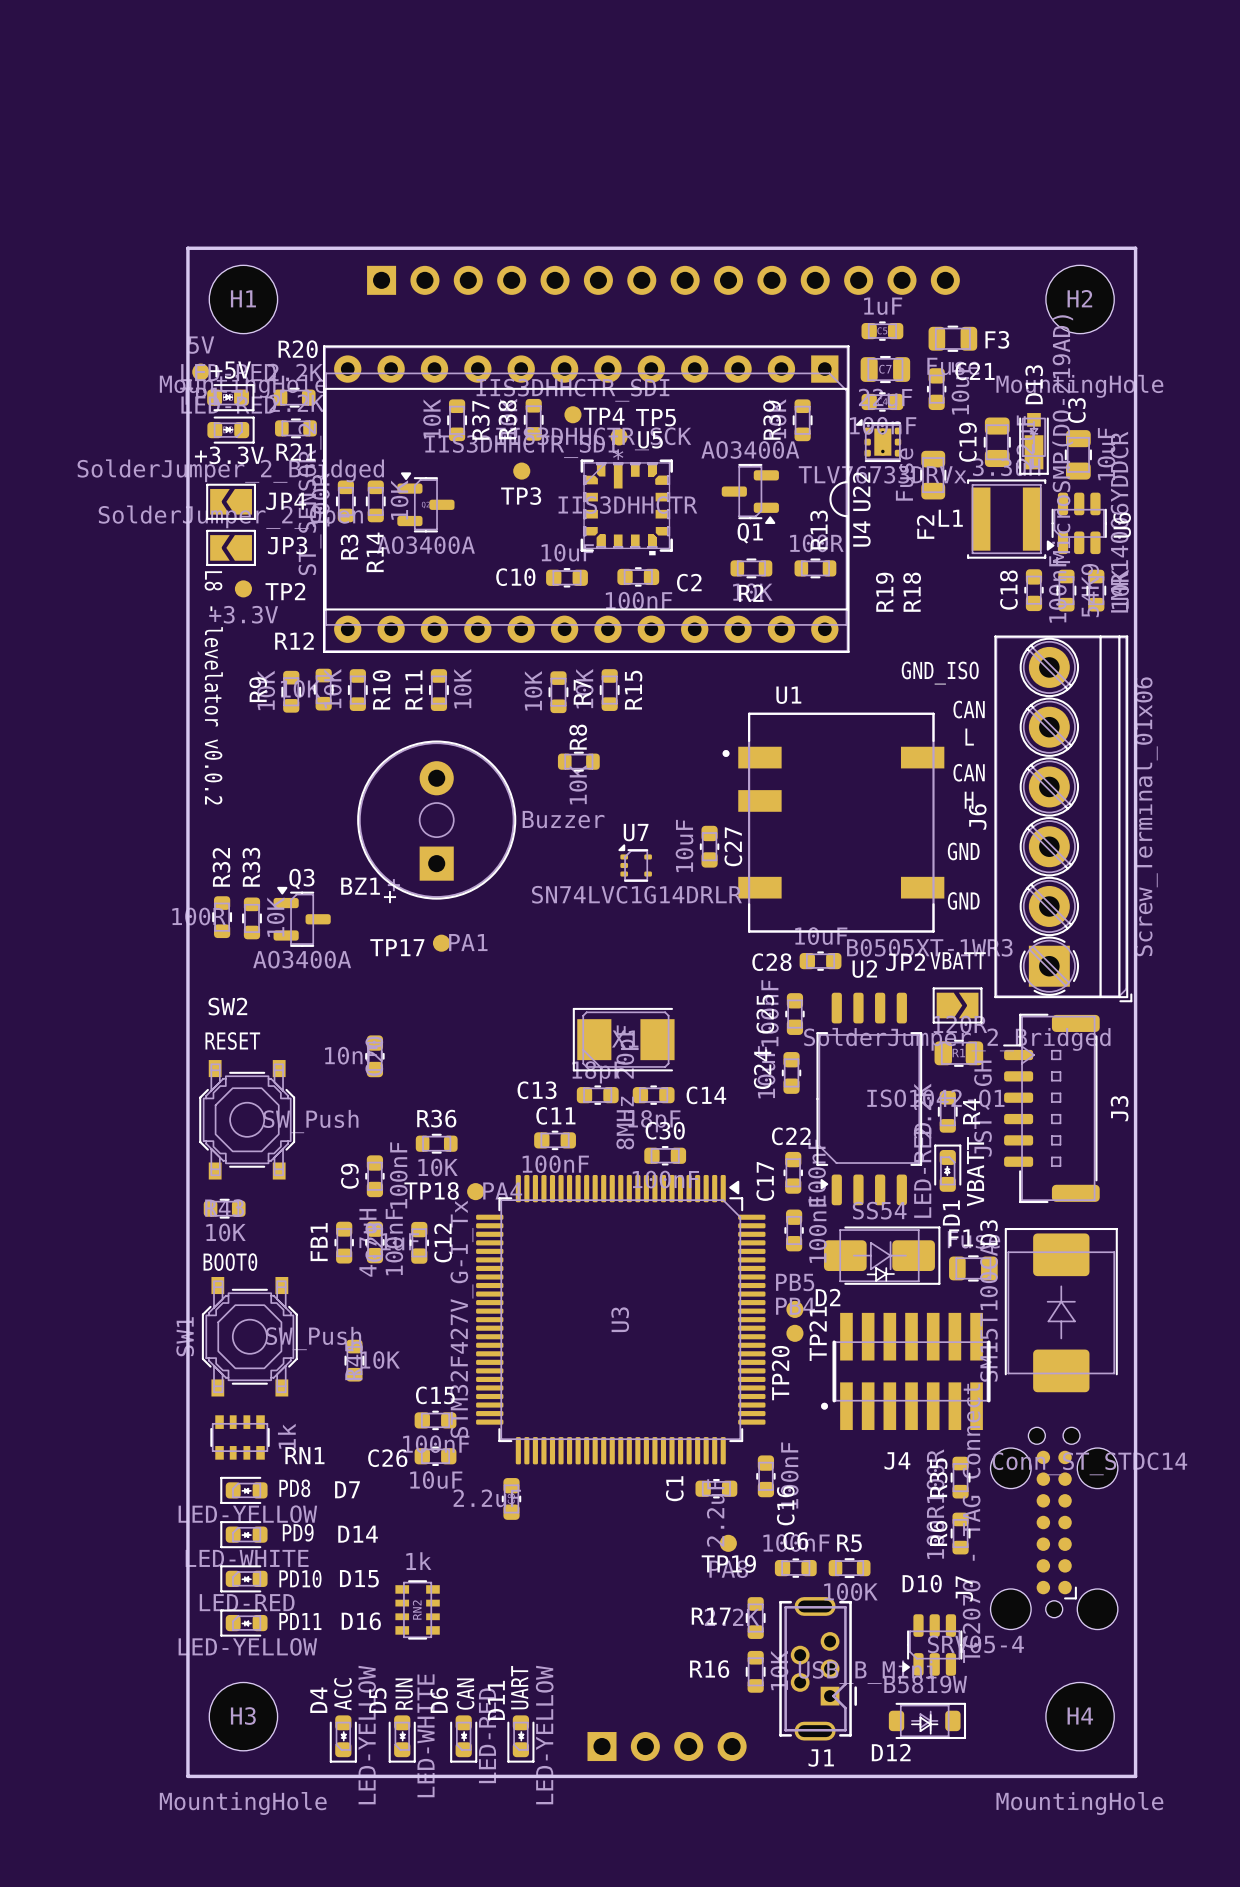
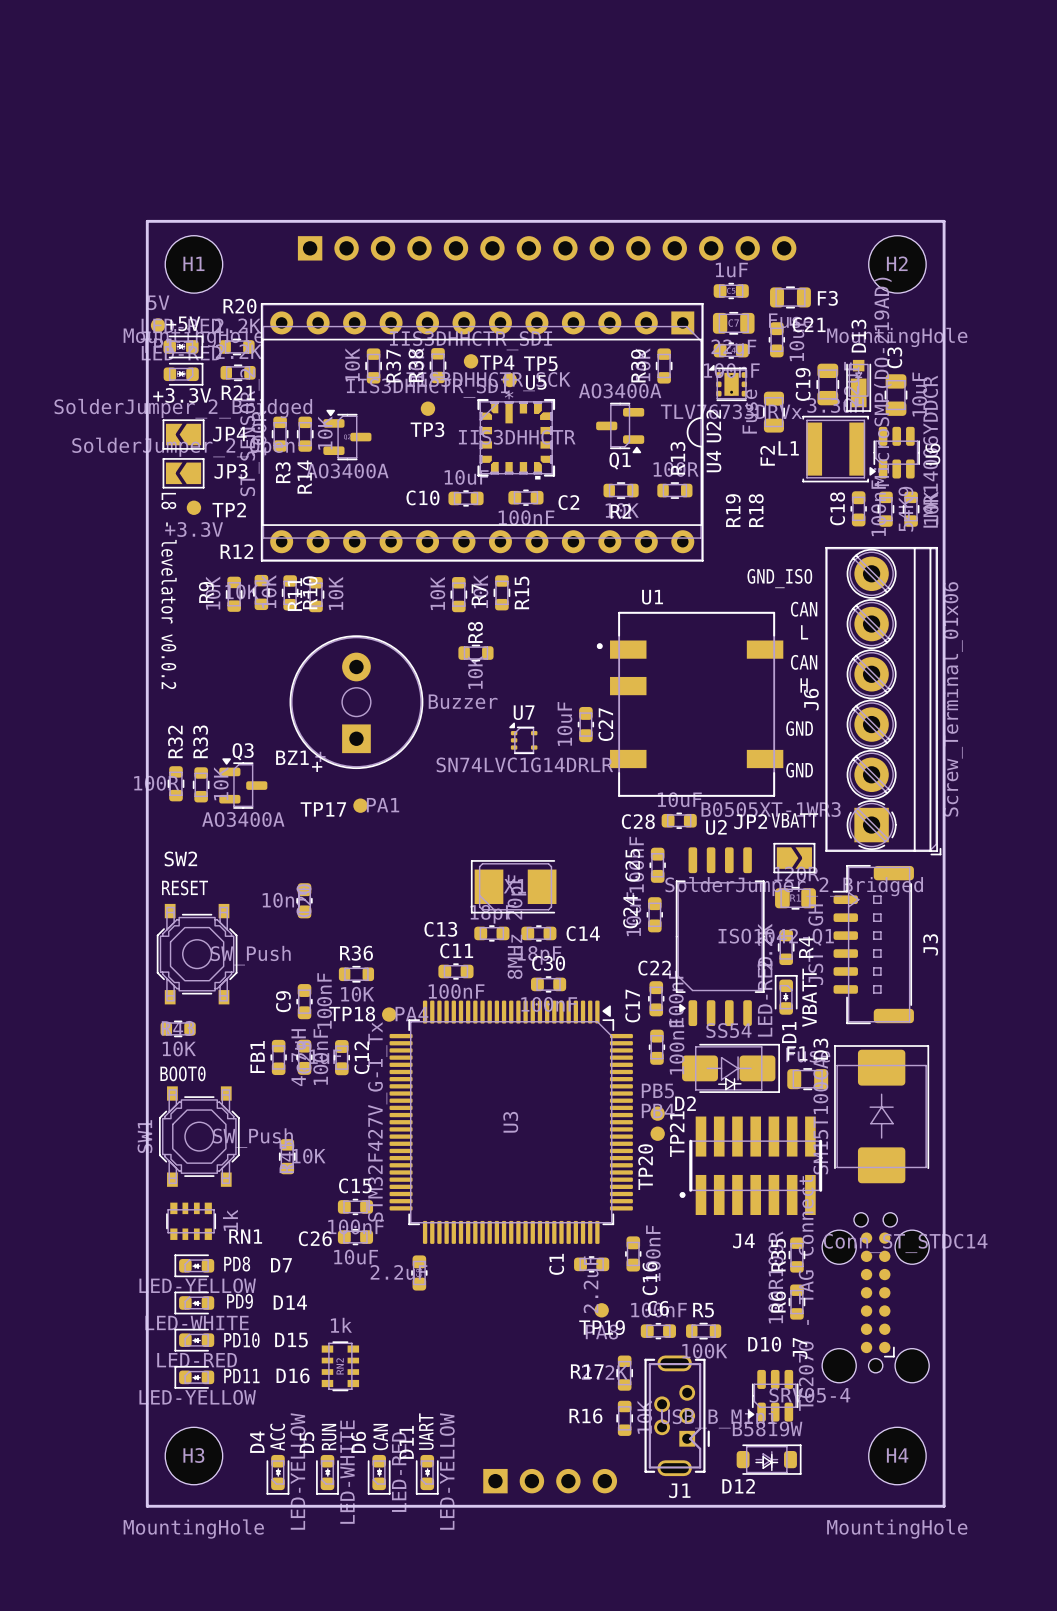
R11 position: (438, 690) -> (315, 594)

